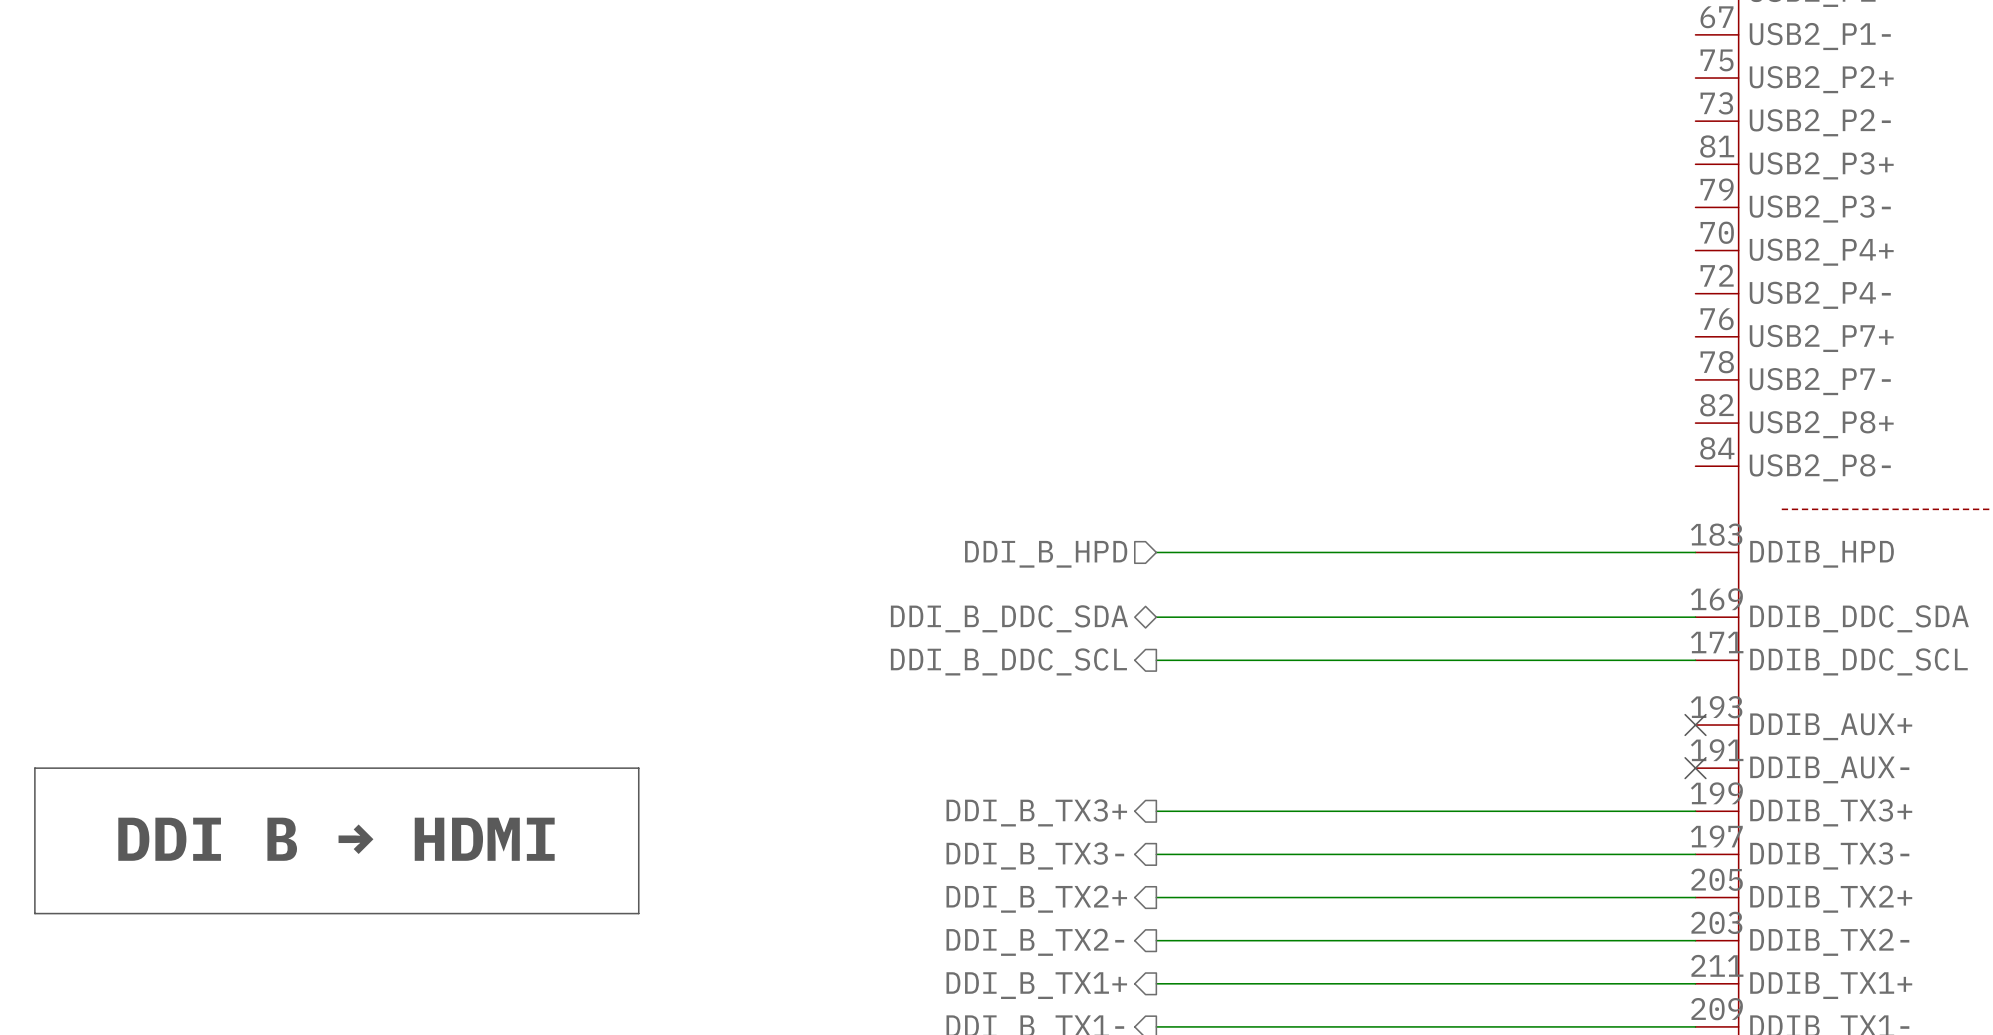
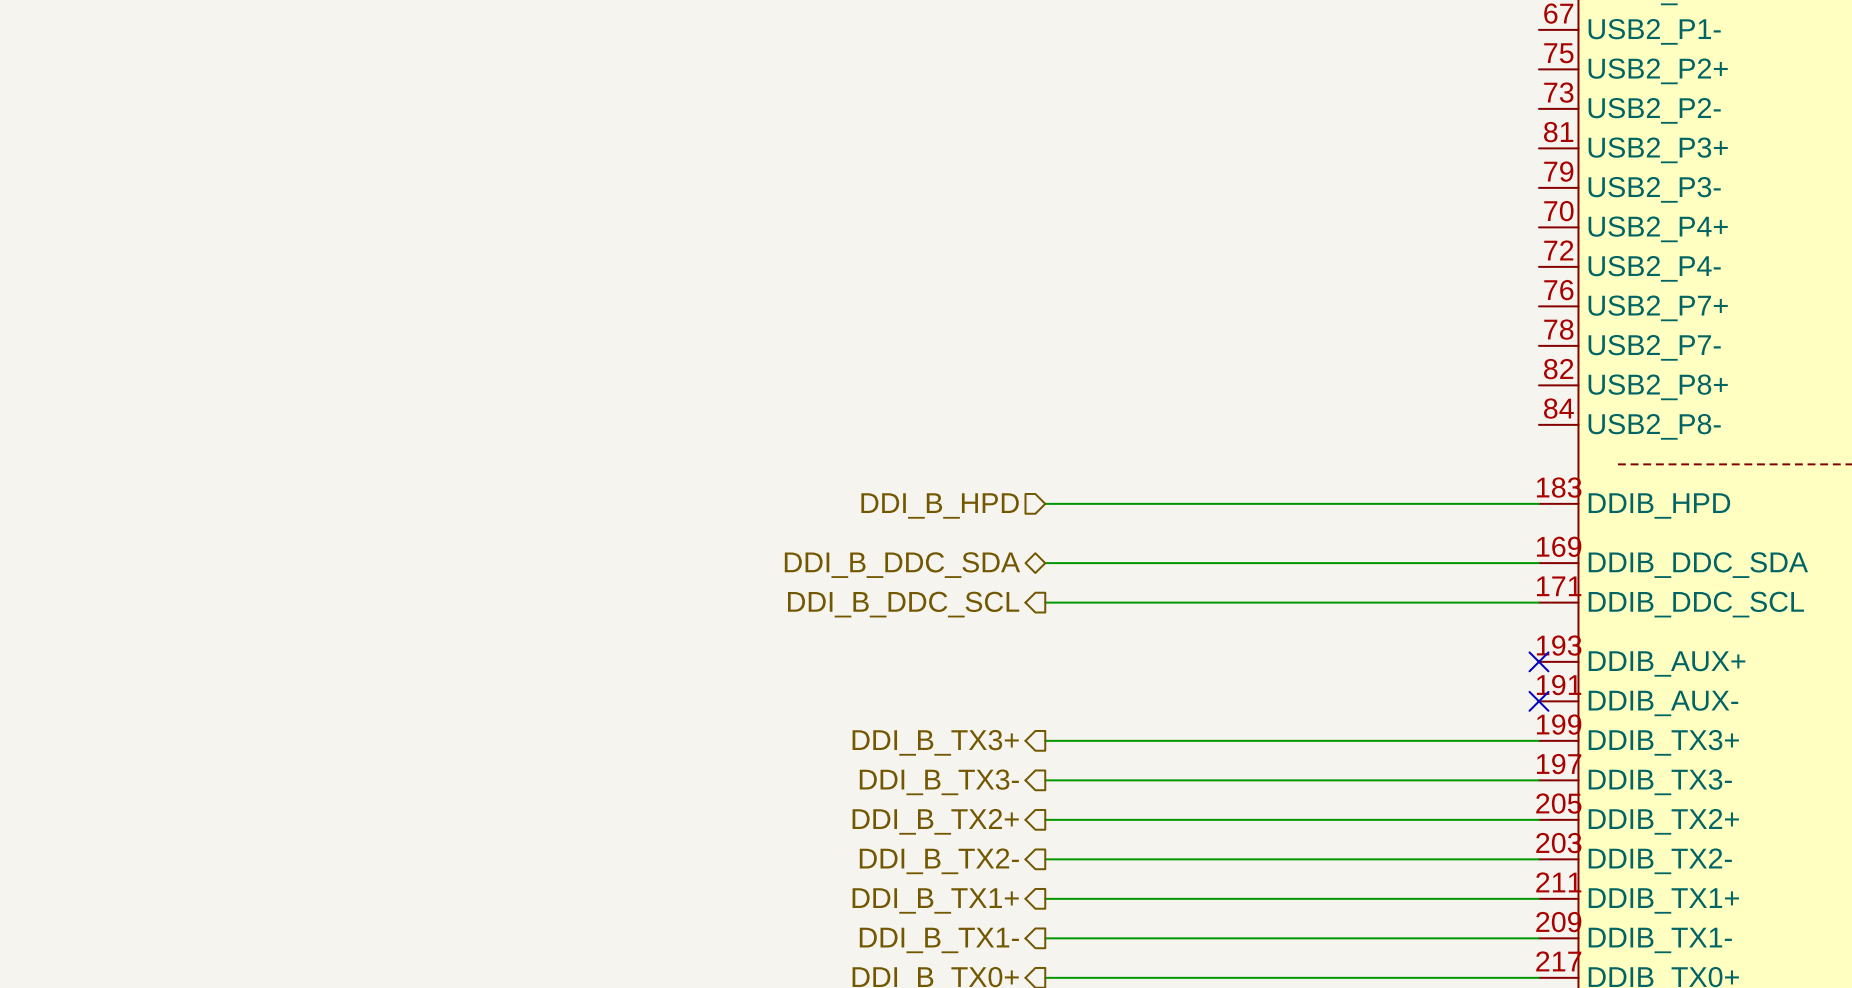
line: (34, 768) (638, 768) (638, 913) (34, 913) (34, 768) -> none
text: DDI B → HDMI (336, 839) -> none

